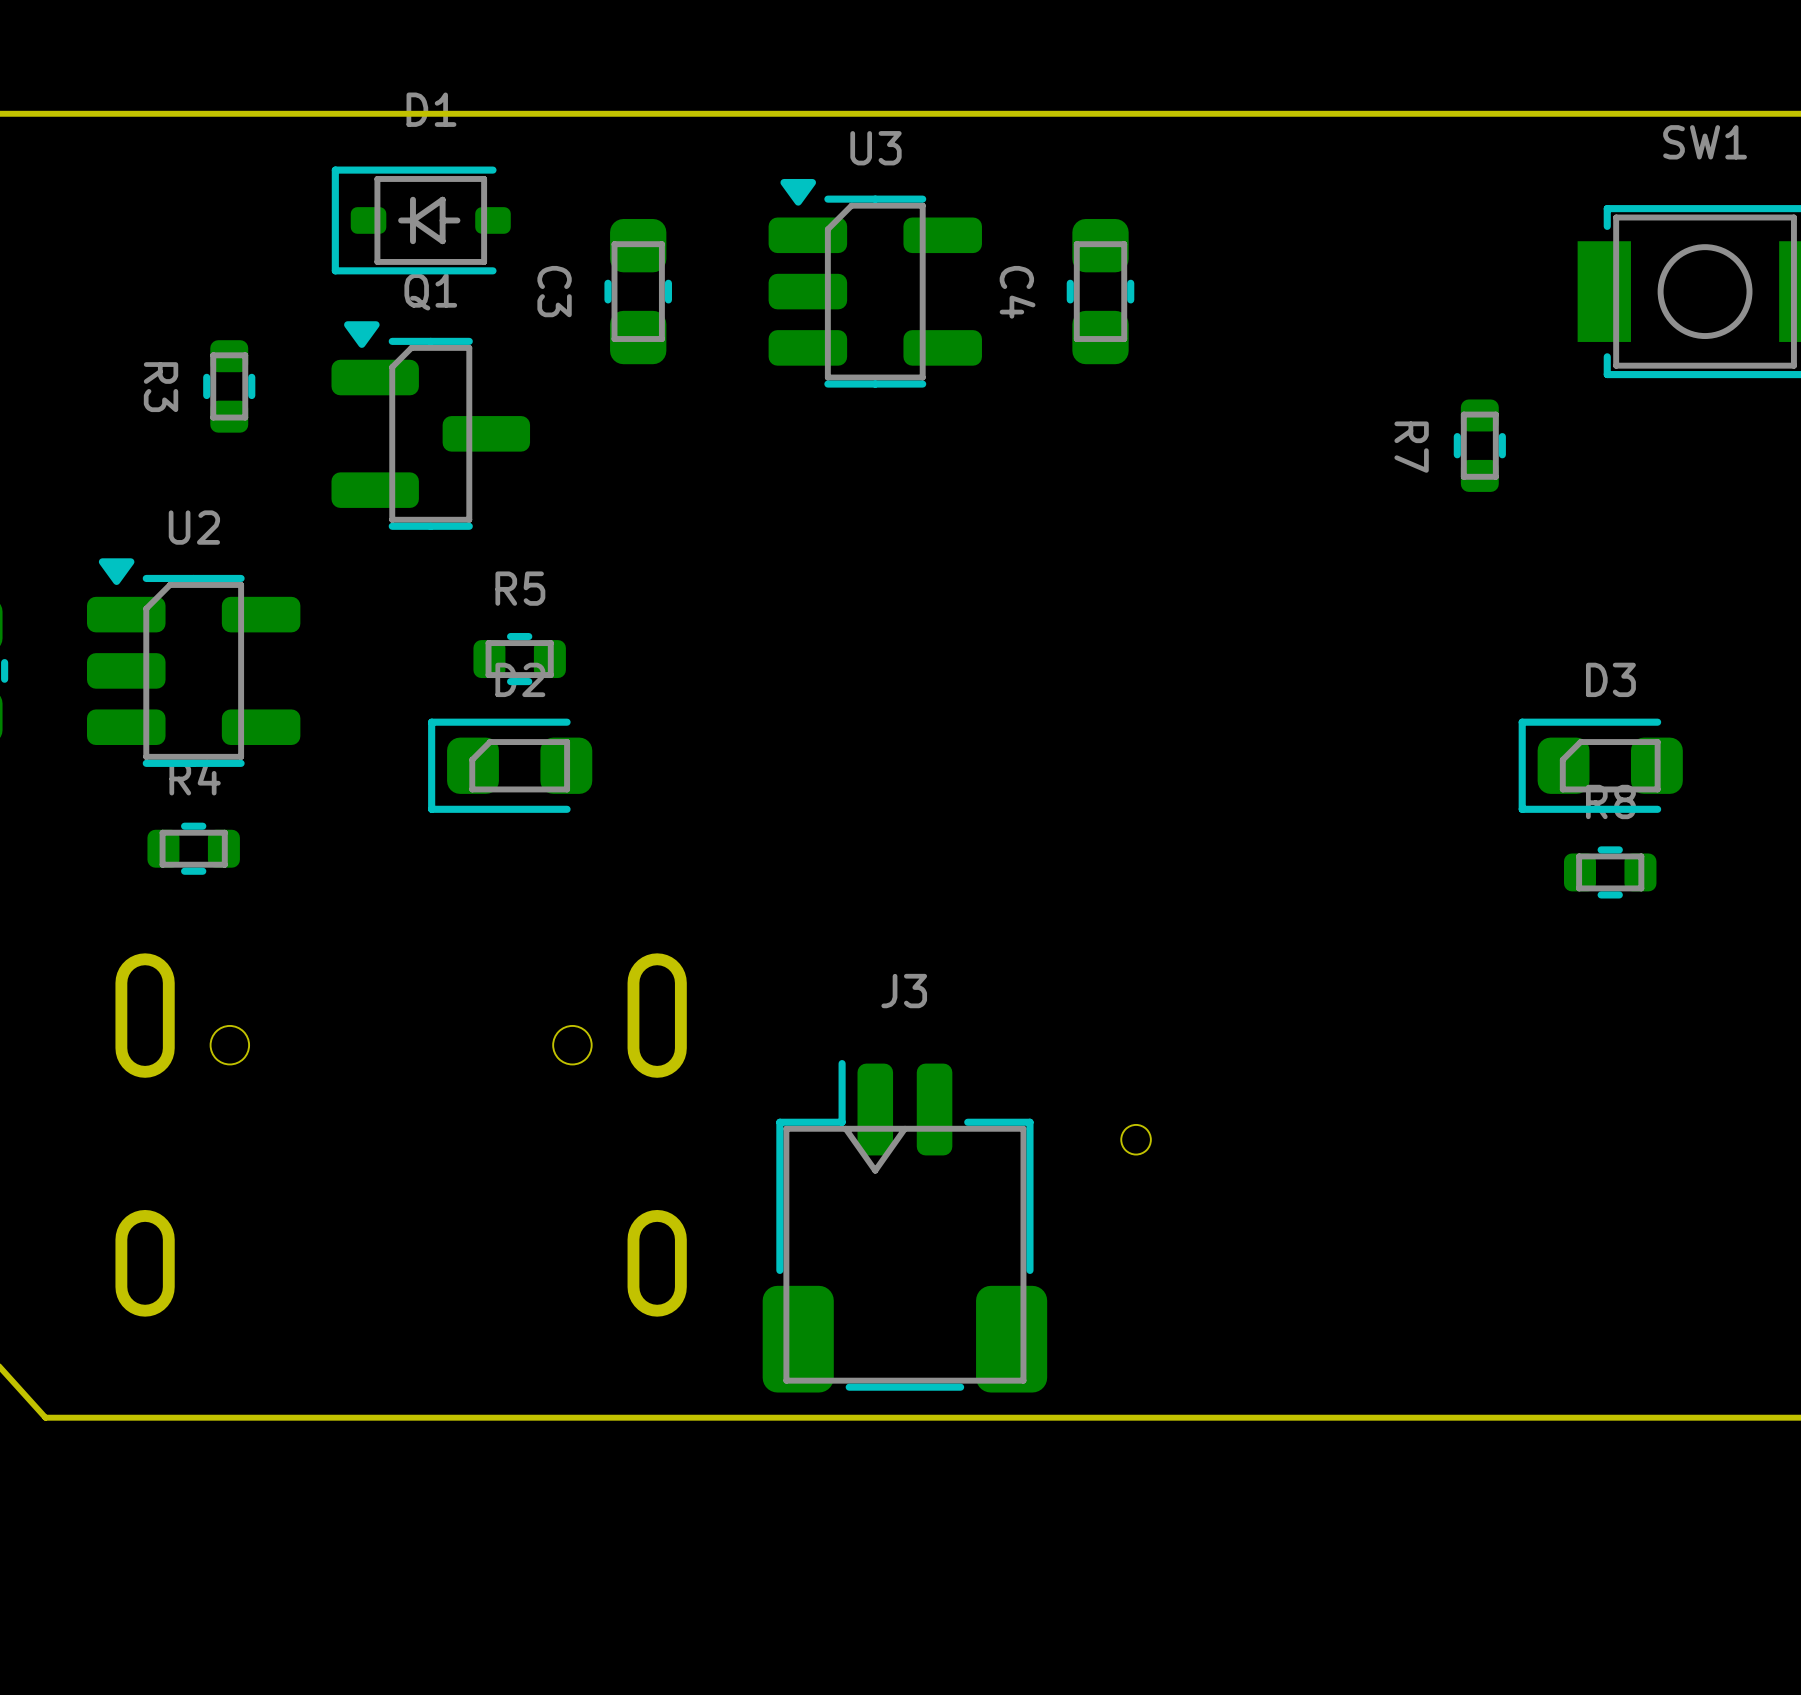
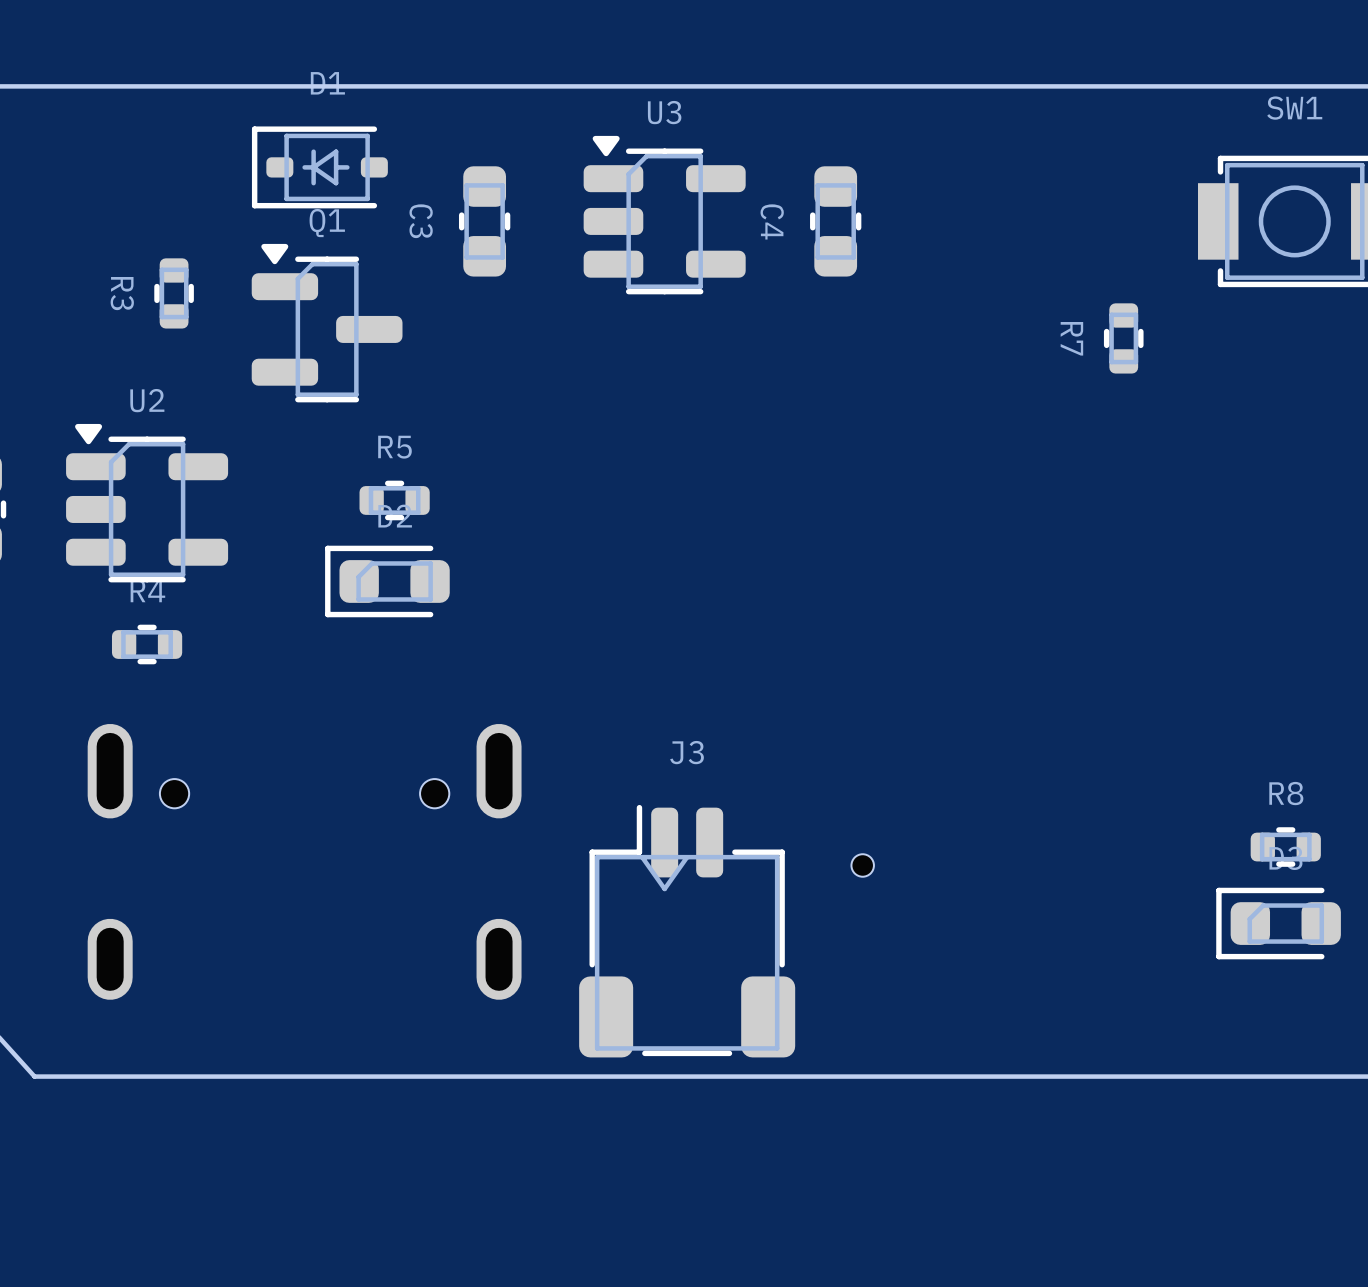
D3 position: (1600, 765) -> (1278, 923)
R8 position: (1610, 872) -> (1285, 847)

